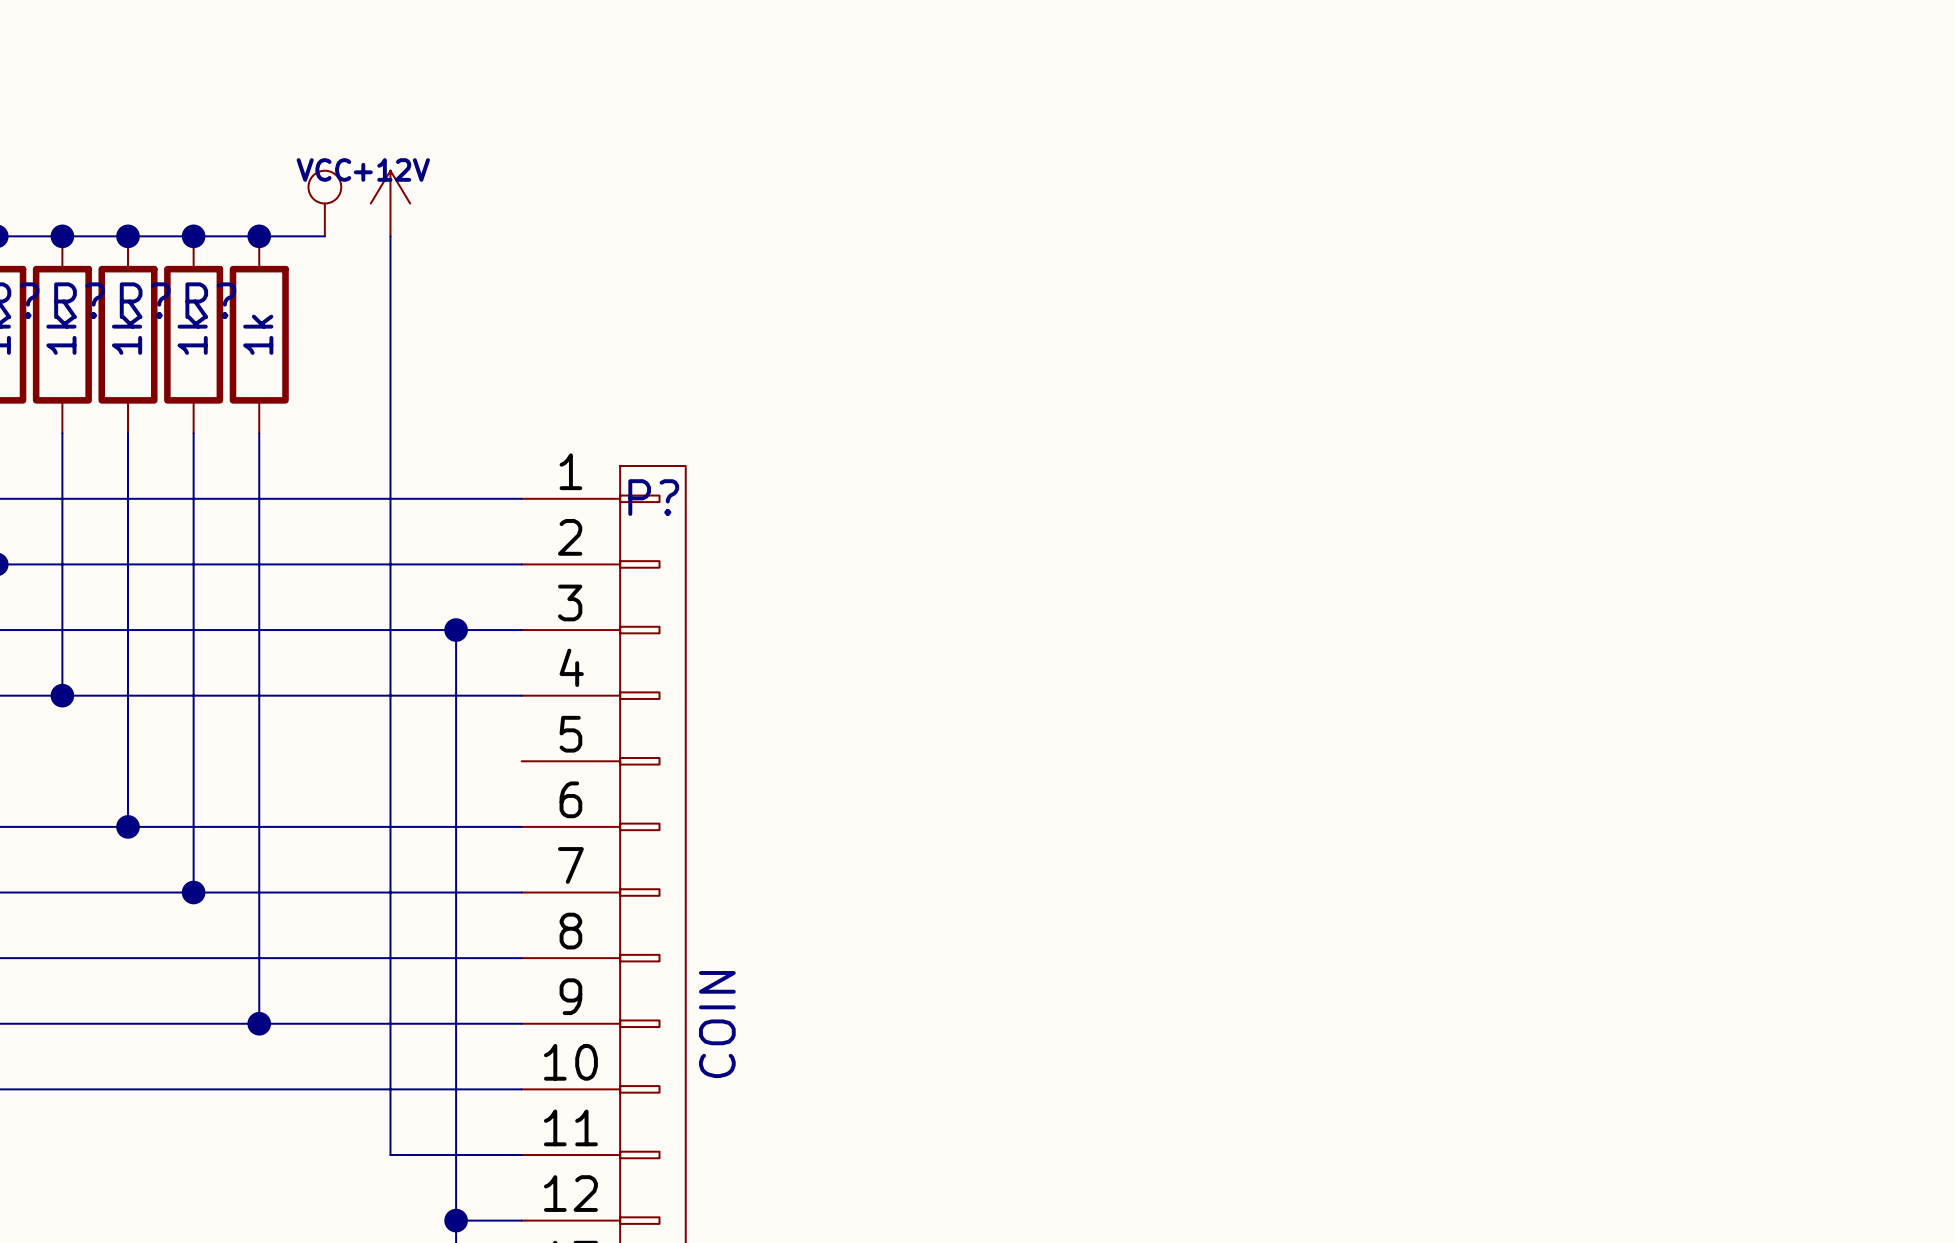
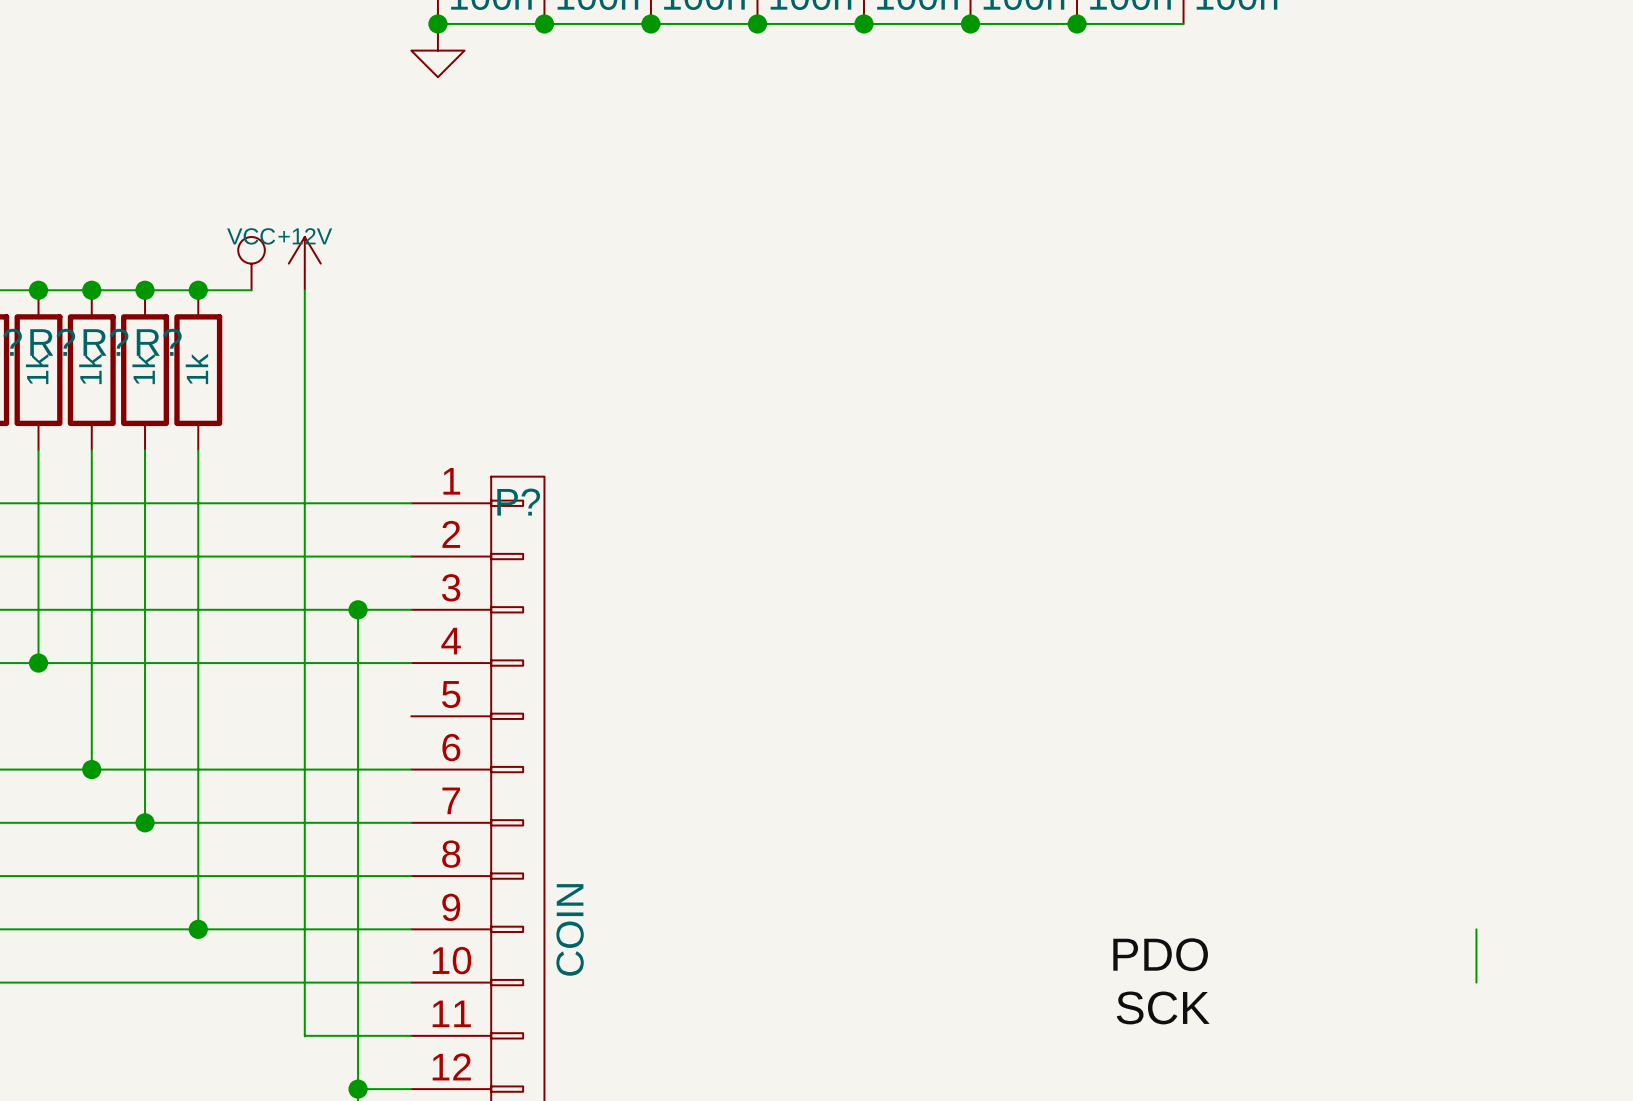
wire: none -> (1476, 929) (1476, 982)
label: none -> PDO (1160, 954)
label: none -> SCK (1163, 1007)

